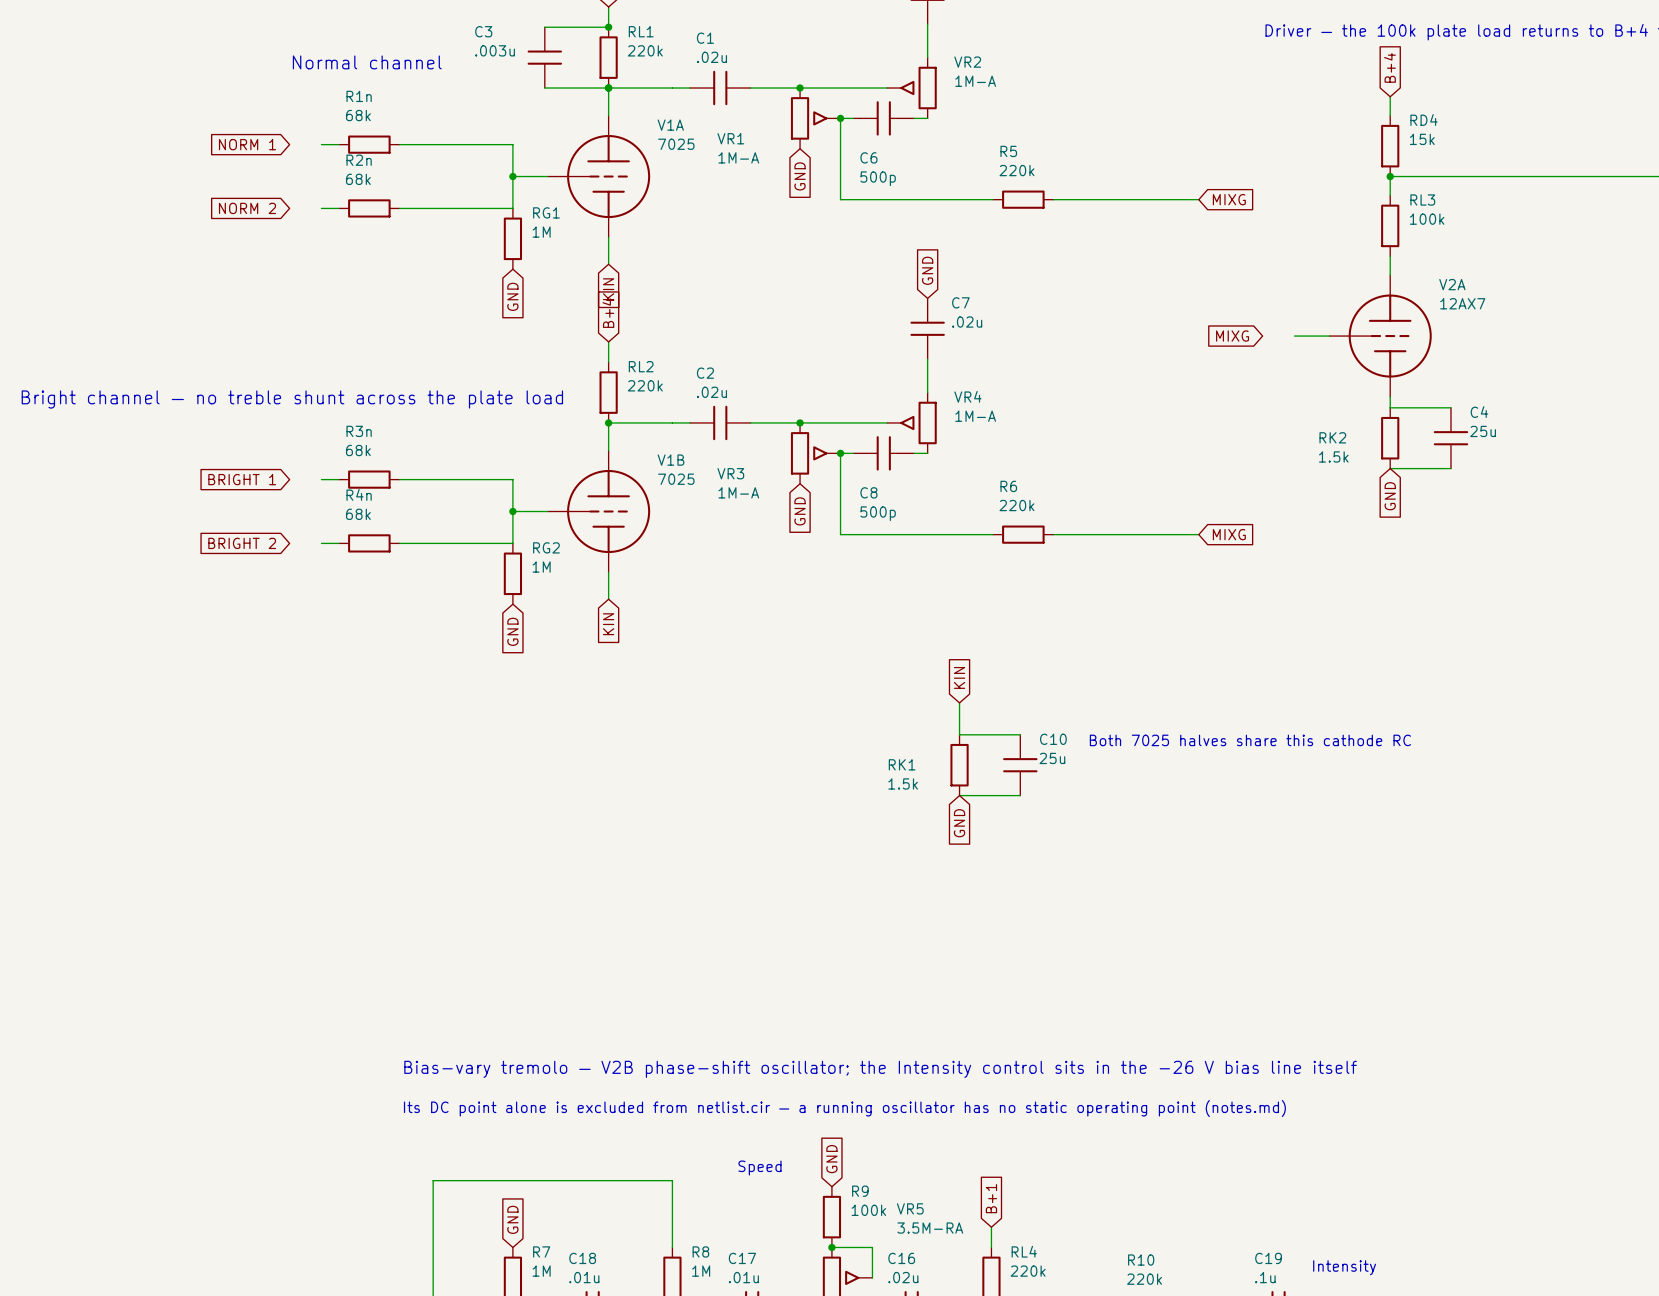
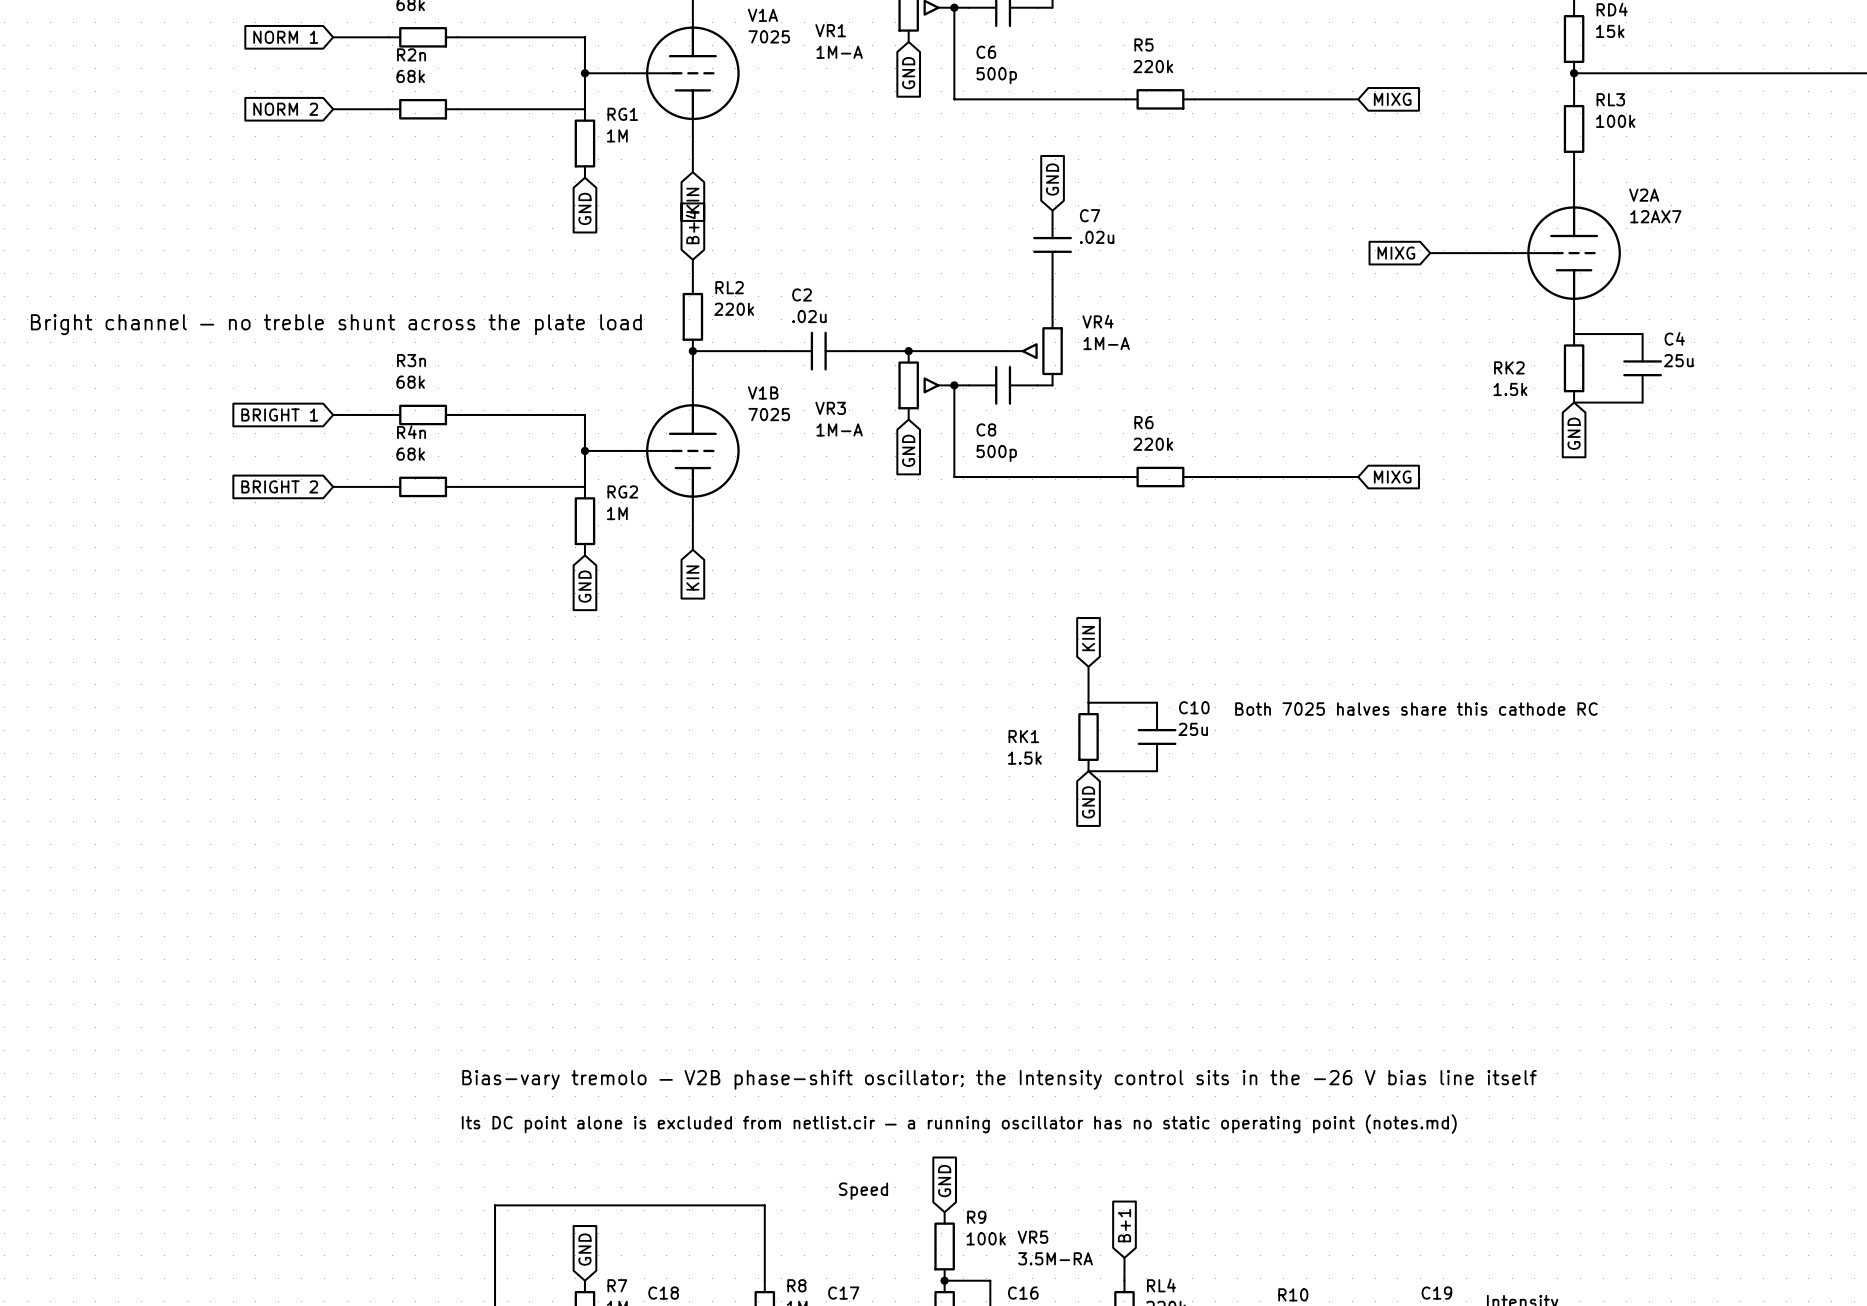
wire: none -> (333, 37) (369, 37)
wire: none -> (333, 109) (369, 109)
wire: none -> (1430, 253) (1466, 253)
wire: none -> (333, 414) (369, 414)
wire: none -> (333, 486) (369, 486)

